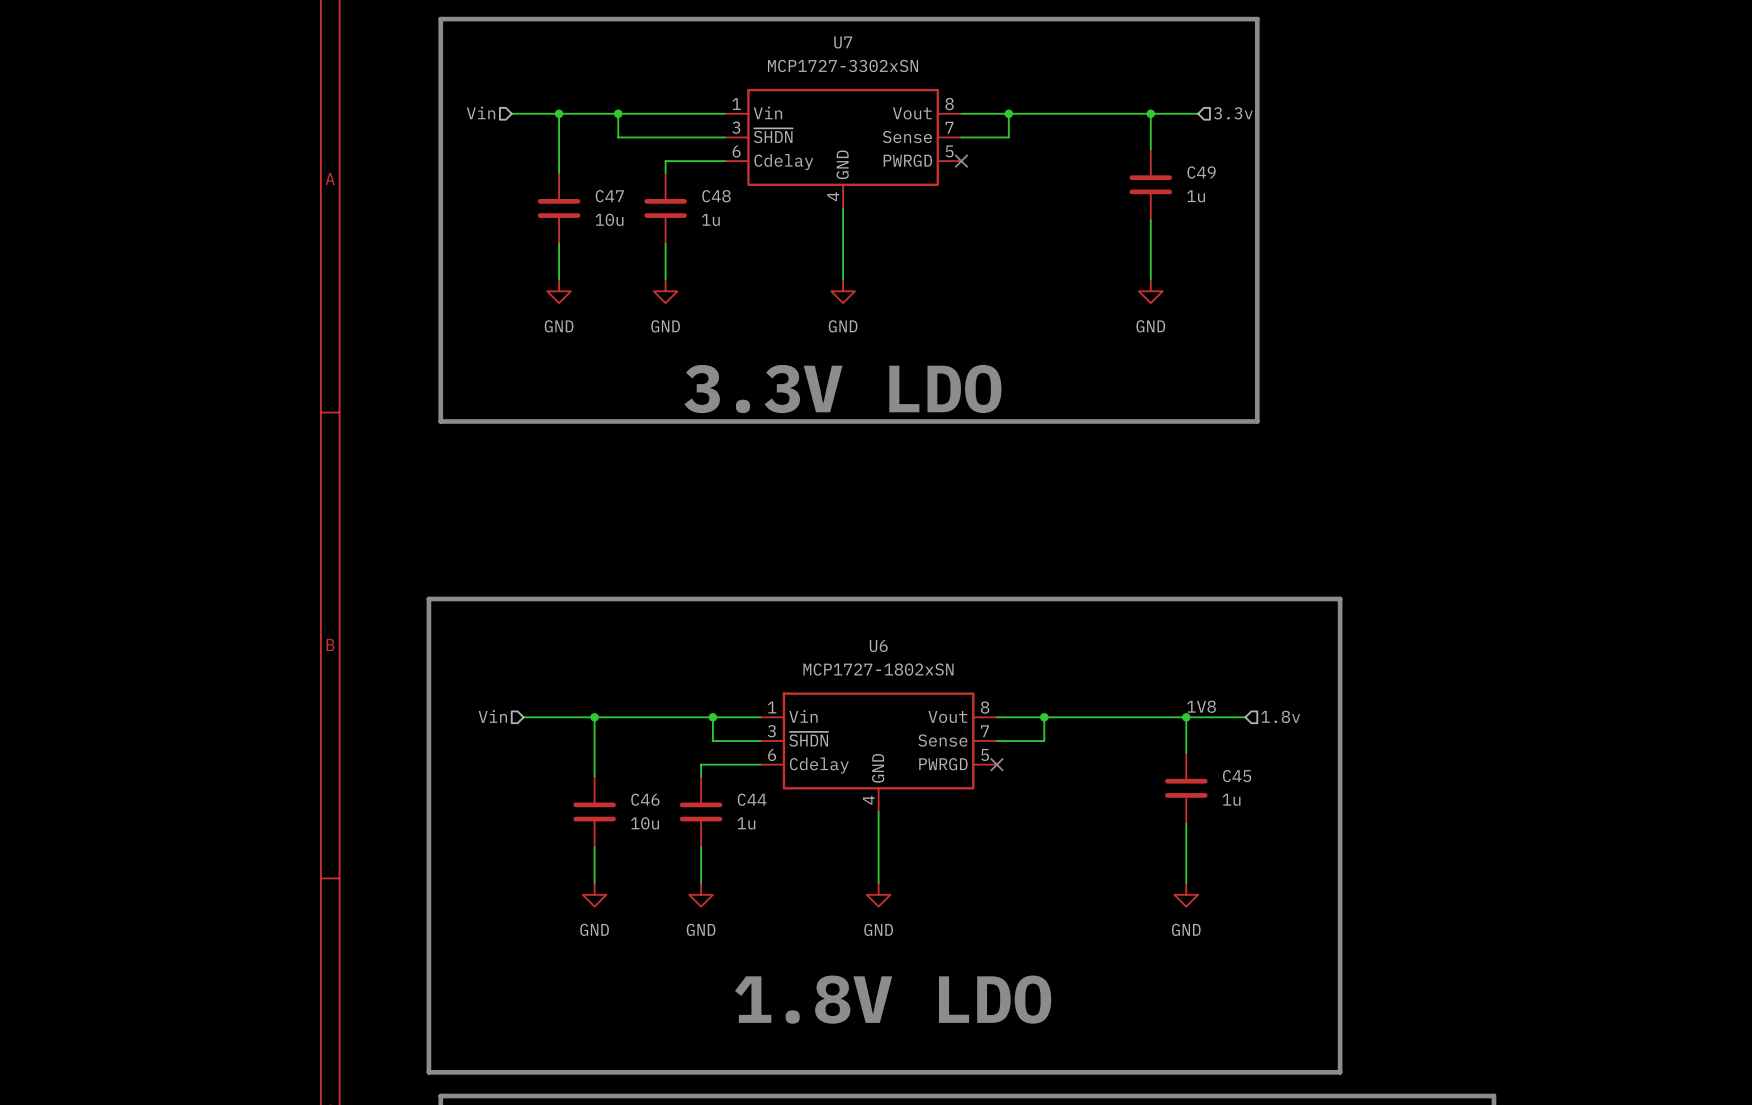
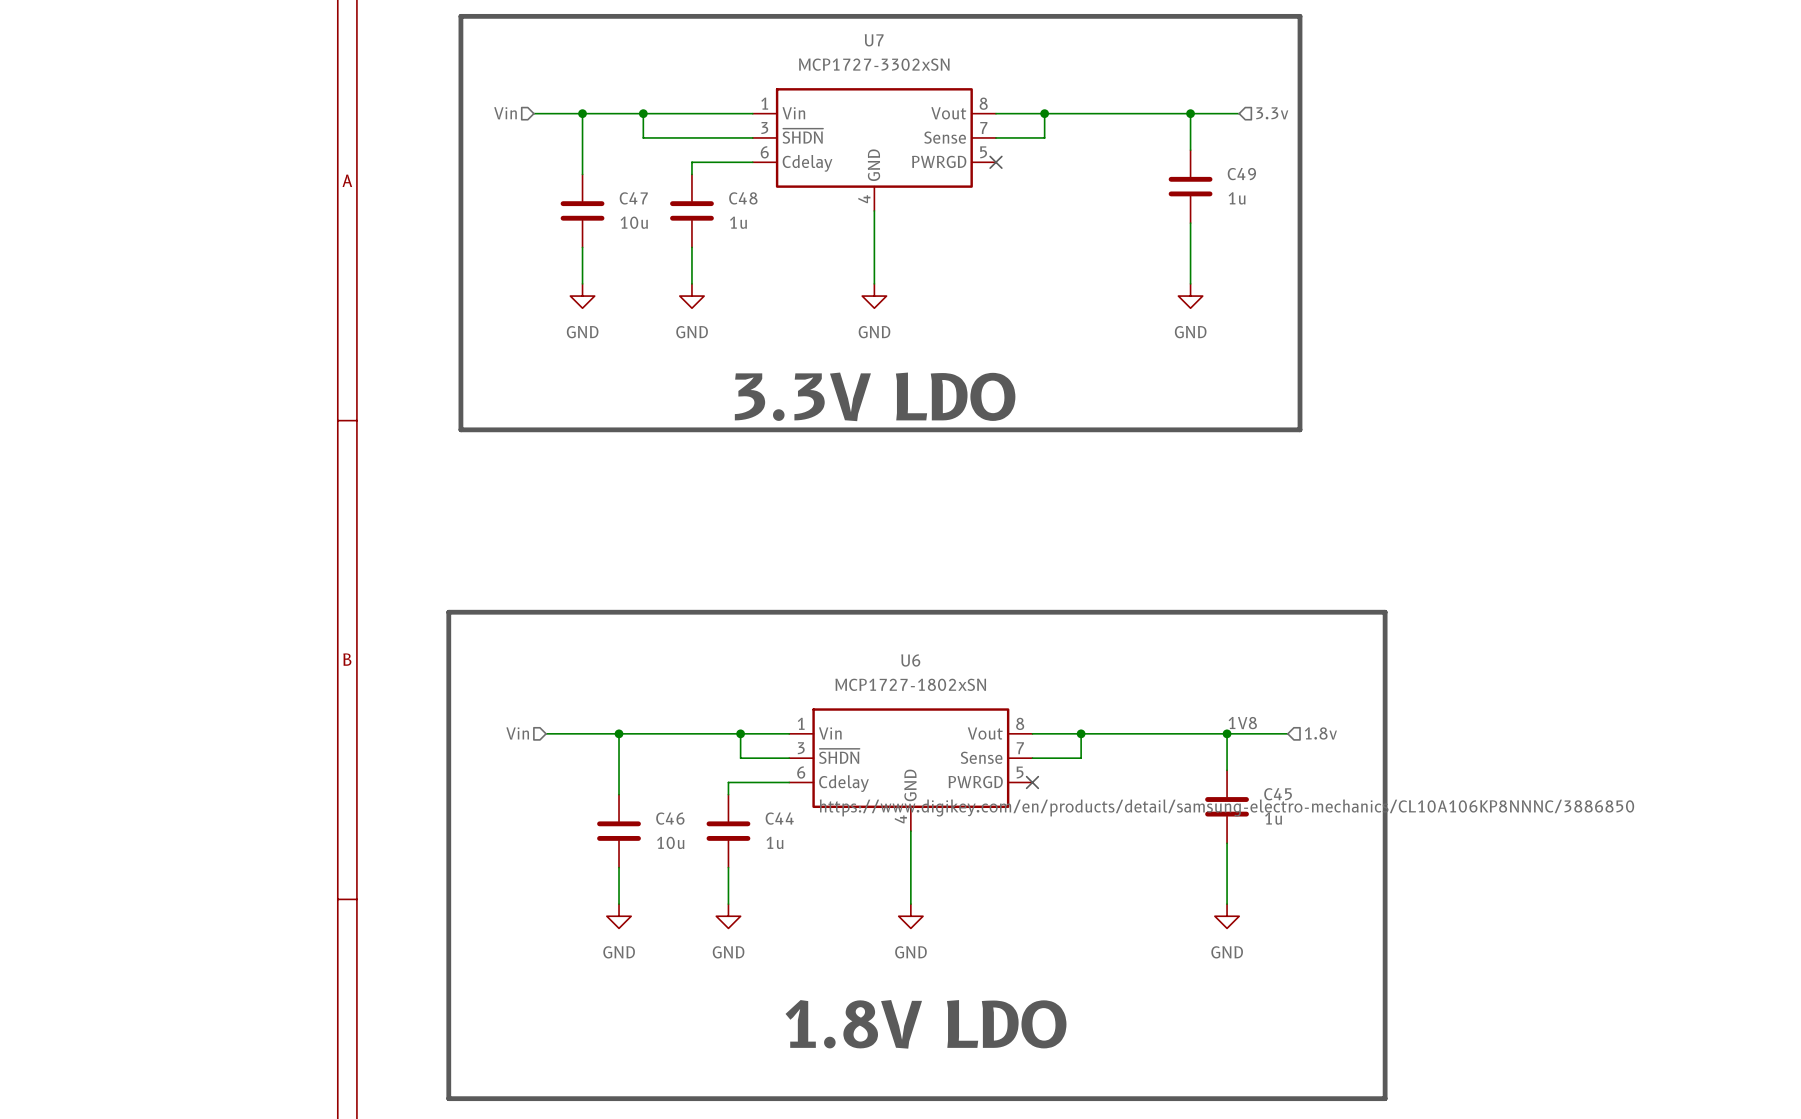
C45 text: none -> https://www.digikey.com/en/products/detail/samsung-electro-mechanics/CL10A106KP8NNNC/3886850 (1227, 808)

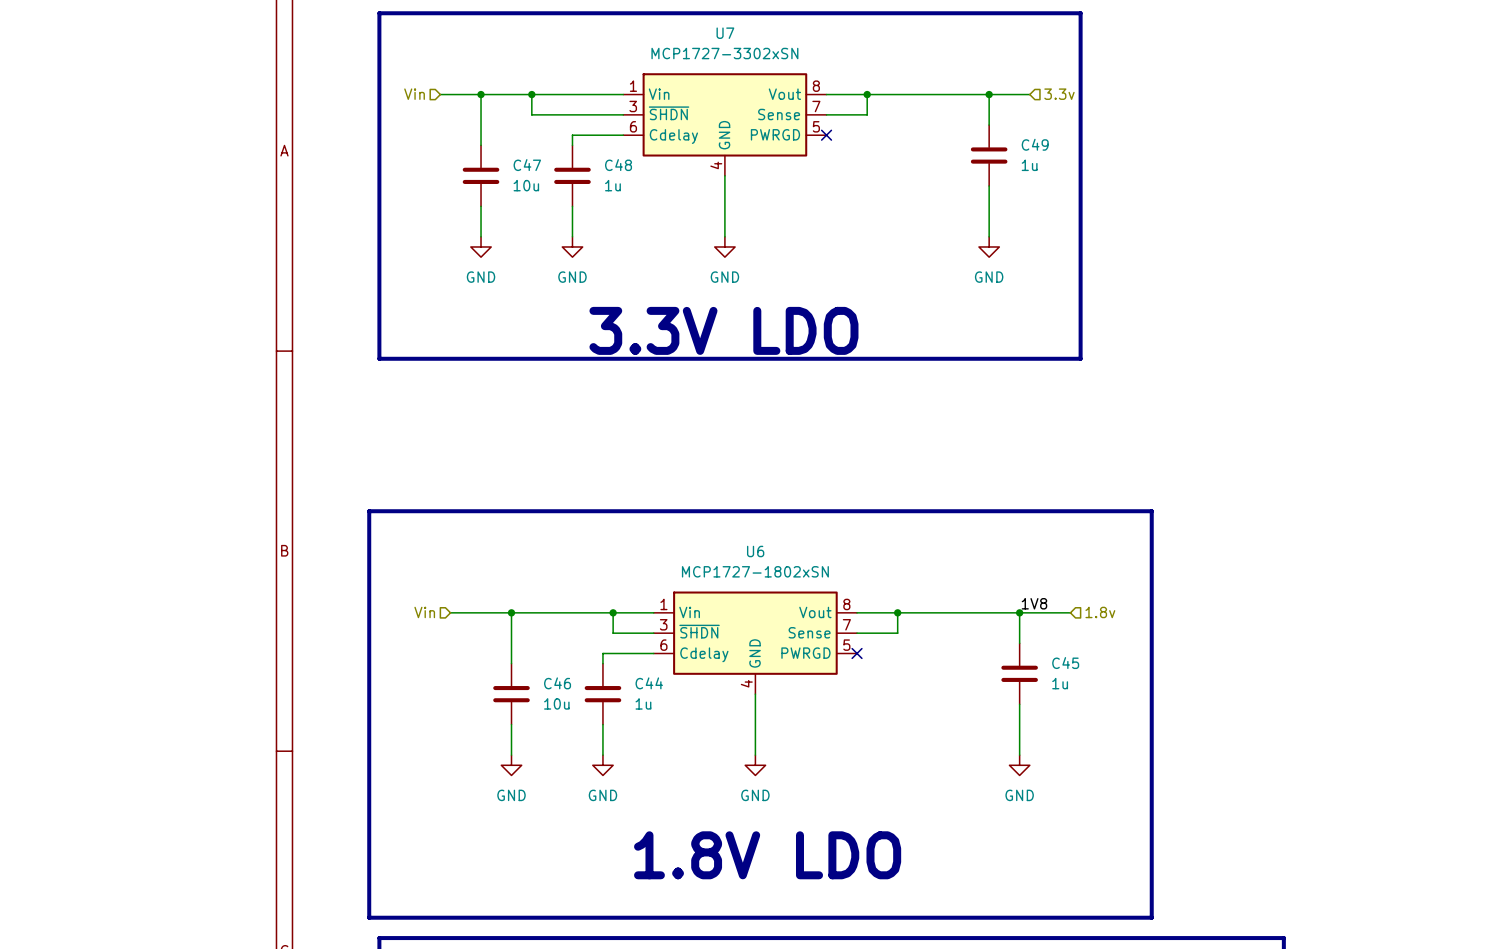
C45 text: https://www.digikey.com/en/products/detail/samsung-electro-mechanics/CL10A106KP8NNNC/3886850 (1227, 808) -> none

